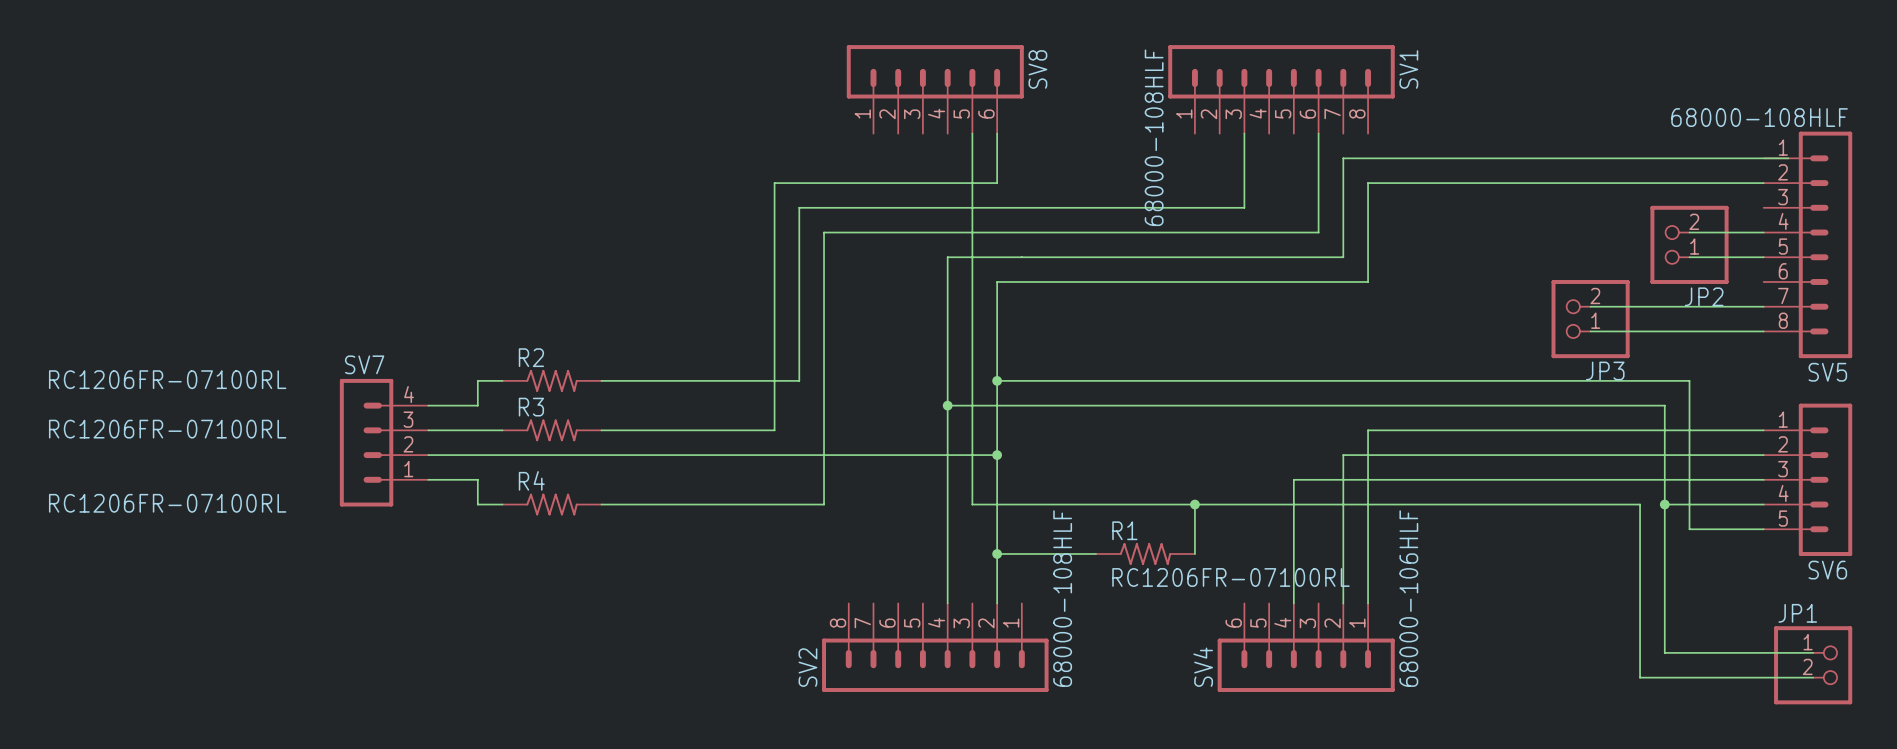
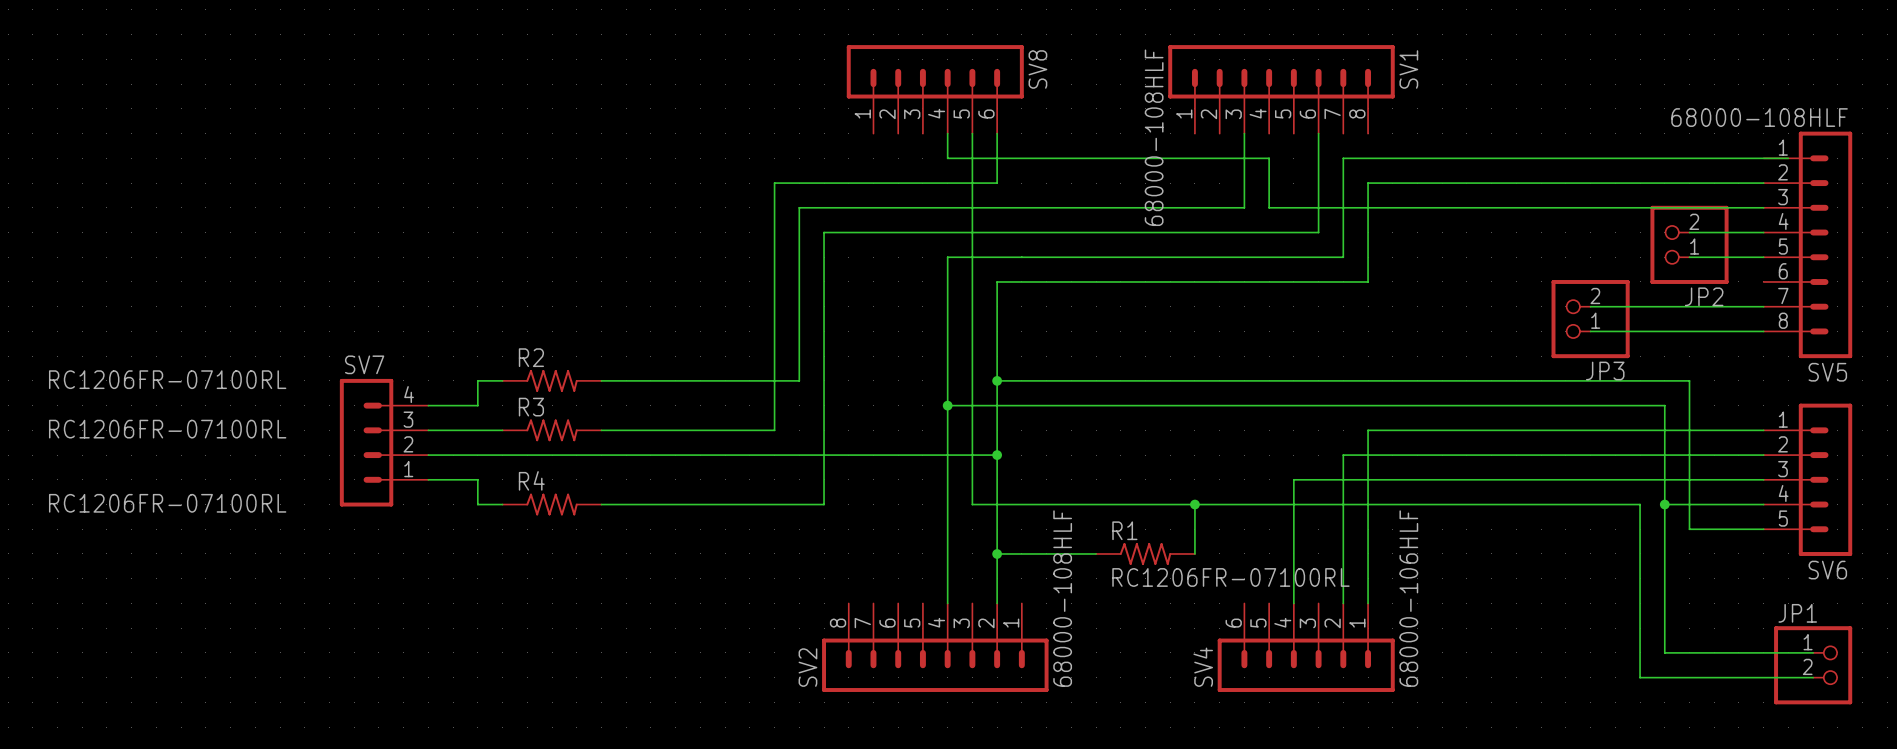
wire: none -> (947, 133) (947, 158) (1269, 158) (1269, 207) (1763, 207)

